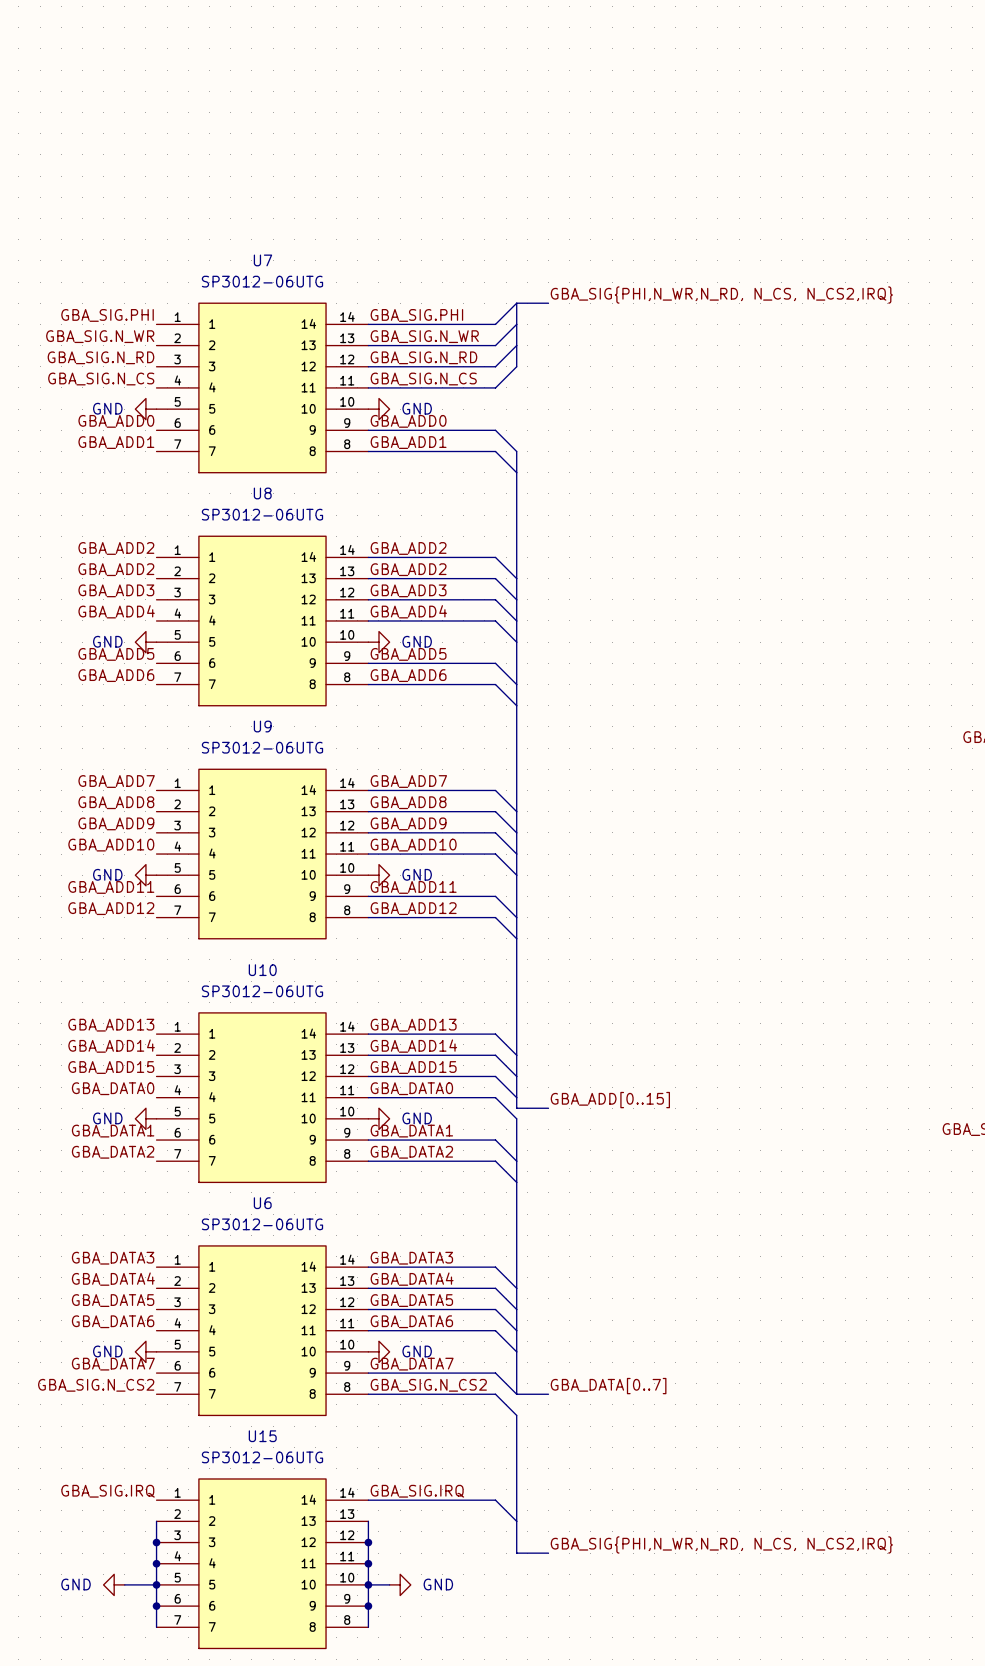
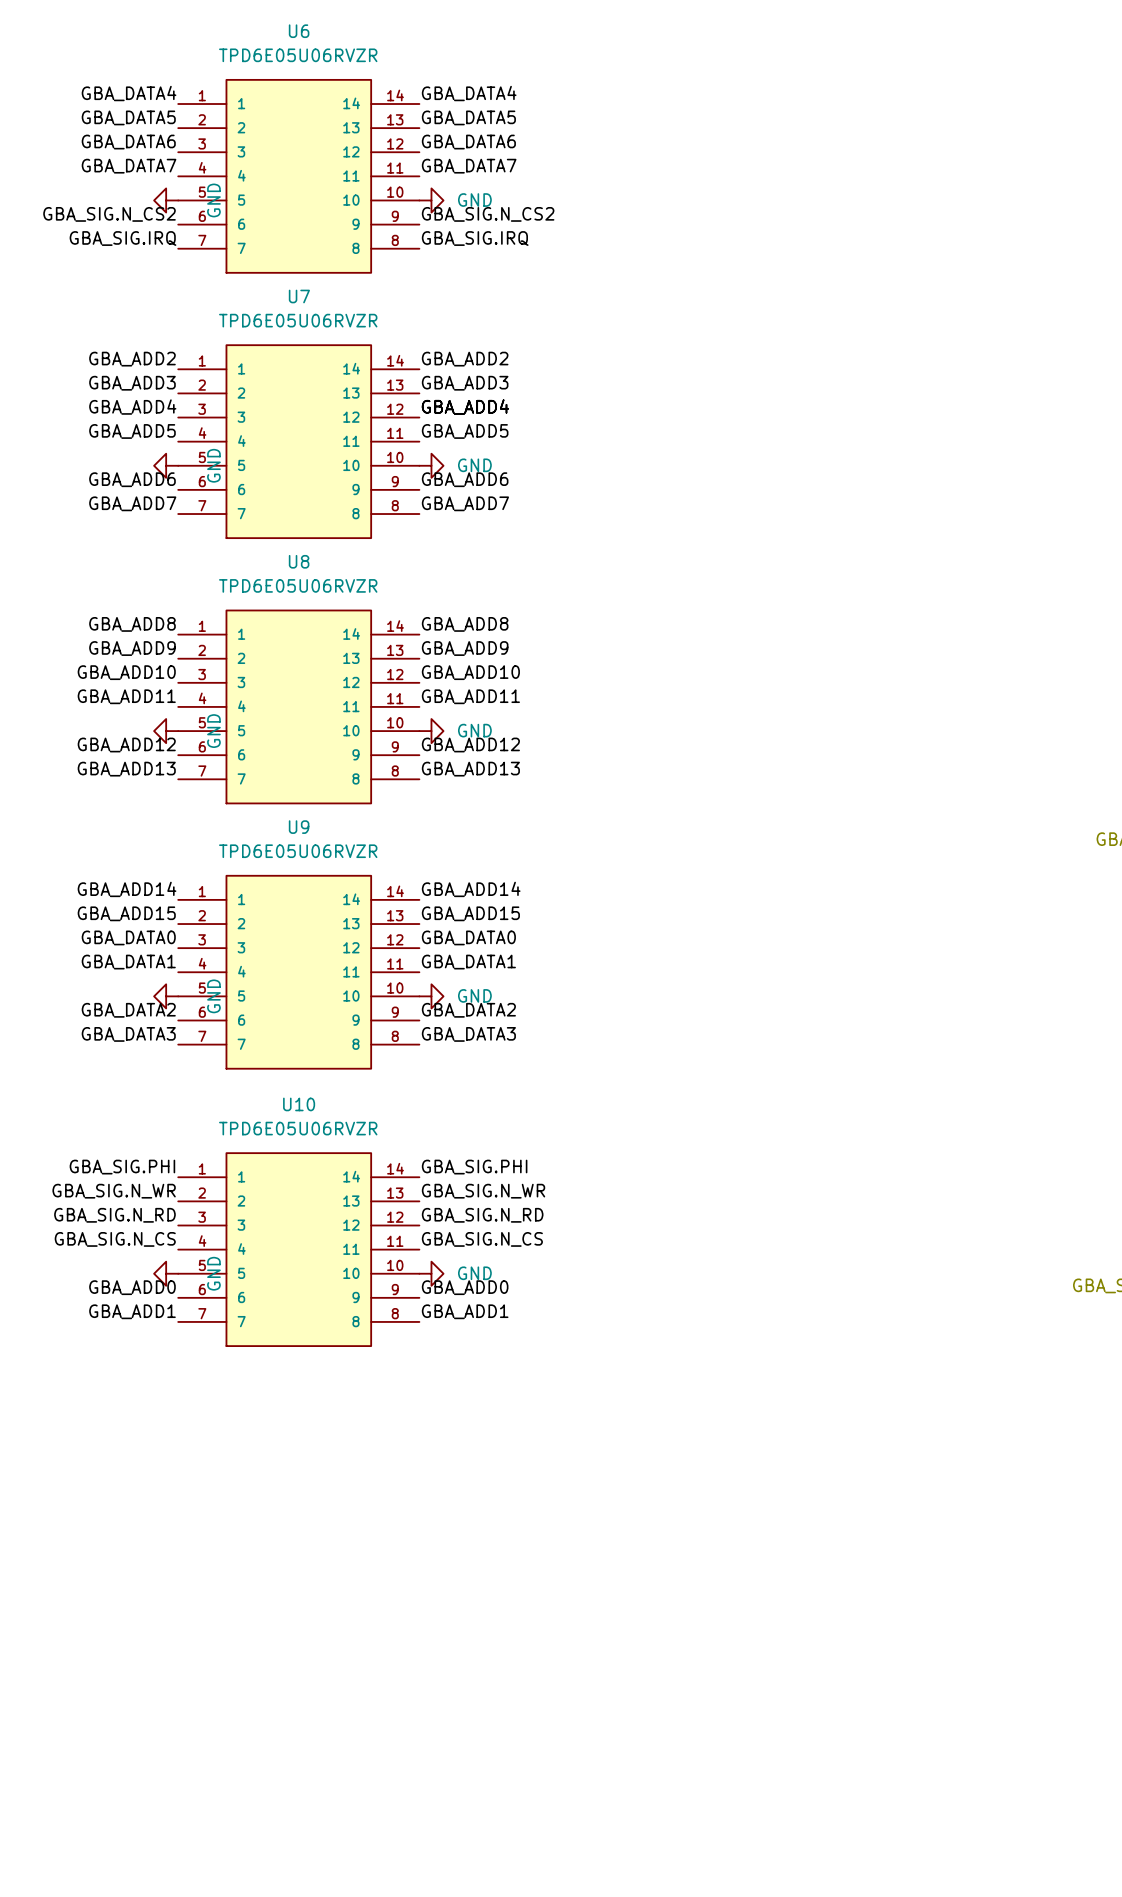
label: none -> GBA_DATA4 (129, 93)
label: none -> GBA_DATA4 (469, 93)
label: none -> GBA_DATA5 (128, 117)
label: none -> GBA_DATA5 (468, 117)
label: none -> GBA_DATA6 (128, 142)
label: none -> GBA_DATA6 (468, 142)
label: none -> GBA_DATA7 (129, 166)
label: none -> GBA_DATA7 (469, 166)
power symbol: none -> GND (166, 200)
power symbol: none -> GND (431, 200)
label: none -> GBA_SIG.N_CS2 (109, 214)
label: none -> GBA_SIG.N_CS2 (488, 214)
label: none -> GBA_SIG.IRQ (123, 238)
label: none -> GBA_SIG.IRQ (475, 238)
U7 value: SP3012-06UTG (262, 281) -> TPD6E05U06RVZR (298, 320)
label: GBA_SIG{PHI,N_WR,N_RD, N_CS, N_CS2,IRQ} (721, 295) -> none
wire: (516, 303) (495, 324) (368, 324) -> none
bus: (548, 303) (516, 303) (516, 366) -> none
label: GBA_SIG.PHI (107, 315) -> GBA_ADD2 (132, 359)
label: GBA_SIG.PHI (416, 315) -> GBA_ADD2 (465, 359)
wire: (516, 324) (495, 345) (368, 345) -> none
label: GBA_SIG.N_WR (100, 336) -> GBA_ADD3 (132, 383)
label: GBA_SIG.N_WR (424, 336) -> GBA_ADD3 (465, 383)
wire: (516, 345) (495, 366) (368, 366) -> none
label: GBA_SIG.N_RD (100, 357) -> GBA_ADD4 (132, 407)
label: GBA_SIG.N_RD (423, 357) -> GBA_ADD4 (465, 407)
wire: (516, 366) (495, 387) (368, 387) -> none
label: GBA_SIG.N_CS (101, 379) -> GBA_ADD5 (132, 431)
label: GBA_SIG.N_CS (423, 379) -> GBA_ADD5 (465, 431)
power symbol text rotation: 0° (107, 408) -> 90° counterclockwise (213, 465)
power symbol text position: GND (107, 408) -> GND (213, 465)
label: GBA_ADD0 (116, 421) -> GBA_ADD6 (132, 479)
label: GBA_ADD0 (408, 421) -> GBA_ADD6 (465, 479)
wire: (368, 430) (495, 430) (516, 451) -> none
label: GBA_ADD1 (116, 442) -> GBA_ADD7 (132, 503)
label: GBA_ADD1 (408, 442) -> GBA_ADD7 (465, 503)
wire: (368, 451) (495, 451) (516, 472) -> none
bus: (516, 451) (516, 1108) (548, 1108) -> none
U8 value: SP3012-06UTG (262, 514) -> TPD6E05U06RVZR (298, 585)
label: GBA_ADD2 (116, 548) -> GBA_ADD8 (132, 624)
label: GBA_ADD2 (408, 548) -> GBA_ADD8 (465, 624)
wire: (368, 557) (495, 557) (516, 578) -> none
label: GBA_ADD2 (116, 569) -> GBA_ADD9 (132, 648)
label: GBA_ADD2 (408, 569) -> GBA_ADD9 (465, 648)
wire: (368, 578) (495, 578) (516, 599) -> none
label: GBA_ADD3 (116, 590) -> GBA_ADD10 (126, 672)
label: GBA_ADD3 (408, 590) -> GBA_ADD10 (470, 672)
wire: (368, 599) (495, 599) (516, 620) -> none
label: GBA_ADD4 (116, 611) -> GBA_ADD11 (126, 696)
label: GBA_ADD4 (408, 611) -> GBA_ADD11 (470, 696)
wire: (368, 620) (495, 620) (516, 642) -> none
power symbol text rotation: 0° (107, 641) -> 90° counterclockwise (213, 731)
power symbol text position: GND (107, 641) -> GND (213, 731)
label: GBA_ADD5 (116, 654) -> GBA_ADD12 (126, 745)
label: GBA_ADD5 (408, 654) -> GBA_ADD12 (470, 745)
wire: (368, 663) (495, 663) (516, 684) -> none
label: GBA_ADD6 (116, 675) -> GBA_ADD13 (126, 769)
label: GBA_ADD6 (408, 675) -> GBA_ADD13 (470, 769)
wire: (368, 684) (495, 684) (516, 705) -> none
U9 value: SP3012-06UTG (262, 747) -> TPD6E05U06RVZR (298, 851)
label: GBA_ADD7 (116, 781) -> GBA_ADD14 (127, 889)
label: GBA_ADD7 (408, 781) -> GBA_ADD14 (471, 889)
wire: (368, 790) (495, 790) (516, 811) -> none
label: GBA_ADD8 (116, 802) -> GBA_ADD15 (126, 913)
label: GBA_ADD8 (408, 802) -> GBA_ADD15 (470, 913)
wire: (368, 811) (495, 811) (516, 832) -> none
label: GBA_ADD9 (116, 823) -> GBA_DATA0 (128, 937)
label: GBA_ADD9 (408, 823) -> GBA_DATA0 (468, 937)
wire: (368, 832) (495, 832) (516, 854) -> none
label: GBA_ADD10 (111, 845) -> GBA_DATA1 (128, 962)
label: GBA_ADD10 (413, 845) -> GBA_DATA1 (468, 962)
wire: (368, 854) (495, 854) (516, 875) -> none
power symbol text rotation: 0° (107, 874) -> 90° counterclockwise (213, 996)
power symbol text position: GND (107, 874) -> GND (213, 996)
label: GBA_ADD11 (111, 887) -> GBA_DATA2 (128, 1010)
label: GBA_ADD11 (413, 887) -> GBA_DATA2 (468, 1010)
wire: (368, 896) (495, 896) (516, 917) -> none
label: GBA_ADD12 (111, 908) -> GBA_DATA3 (128, 1034)
label: GBA_ADD12 (413, 908) -> GBA_DATA3 (468, 1034)
wire: (368, 917) (495, 917) (516, 938) -> none
U10 value: SP3012-06UTG (262, 991) -> TPD6E05U06RVZR (298, 1128)
label: GBA_ADD13 (111, 1025) -> GBA_SIG.PHI (122, 1167)
label: GBA_ADD13 (413, 1025) -> GBA_SIG.PHI (474, 1167)
wire: (368, 1034) (495, 1034) (516, 1055) -> none
label: GBA_ADD14 (111, 1046) -> GBA_SIG.N_WR (114, 1191)
label: GBA_ADD14 (413, 1046) -> GBA_SIG.N_WR (483, 1191)
wire: (368, 1055) (495, 1055) (516, 1076) -> none
label: GBA_ADD15 (111, 1067) -> GBA_SIG.N_RD (114, 1215)
label: GBA_ADD15 (413, 1067) -> GBA_SIG.N_RD (482, 1215)
wire: (368, 1076) (495, 1076) (516, 1097) -> none
label: GBA_DATA0 (113, 1088) -> GBA_SIG.N_CS (115, 1239)
label: GBA_DATA0 (411, 1088) -> GBA_SIG.N_CS (482, 1239)
wire: (368, 1097) (495, 1097) (516, 1118) -> none
label: GBA_ADD[0..15] (610, 1100) -> none
power symbol text rotation: 0° (107, 1118) -> 90° counterclockwise (213, 1273)
power symbol text position: GND (107, 1118) -> GND (213, 1273)
bus: (516, 1118) (516, 1394) (548, 1394) -> none
label: GBA_DATA1 (113, 1131) -> GBA_ADD0 (132, 1287)
label: GBA_DATA1 (411, 1131) -> GBA_ADD0 (465, 1287)
wire: (368, 1140) (495, 1140) (516, 1161) -> none
label: GBA_DATA2 (113, 1152) -> GBA_ADD1 (132, 1311)
label: GBA_DATA2 (411, 1152) -> GBA_ADD1 (465, 1311)
wire: (368, 1161) (495, 1161) (516, 1182) -> none
U6 value: SP3012-06UTG (262, 1224) -> TPD6E05U06RVZR (298, 55)
label: GBA_DATA3 (113, 1258) -> none
label: GBA_DATA3 (411, 1258) -> none
wire: (368, 1267) (495, 1267) (516, 1288) -> none
label: GBA_DATA4 (113, 1279) -> none
label: GBA_DATA4 (412, 1279) -> none
wire: (368, 1288) (495, 1288) (516, 1309) -> none
label: GBA_DATA5 (113, 1300) -> none
label: GBA_DATA5 (411, 1300) -> none
wire: (368, 1309) (495, 1309) (516, 1330) -> none
label: GBA_DATA6 (113, 1321) -> none
label: GBA_DATA6 (411, 1321) -> none
U6 position: (262, 1330) -> (298, 176)
wire: (368, 1330) (495, 1330) (516, 1351) -> none
power symbol: GND (145, 1351) -> none
power symbol: GND (378, 1351) -> none
label: GBA_DATA7 (113, 1364) -> none
label: GBA_DATA7 (412, 1364) -> none
wire: (368, 1373) (495, 1373) (516, 1394) -> none
label: GBA_SIG.N_CS2 (96, 1385) -> none
label: GBA_SIG.N_CS2 (428, 1385) -> none
label: GBA_DATA[0..7] (608, 1386) -> none
wire: (368, 1394) (495, 1394) (516, 1415) -> none
bus: (516, 1415) (516, 1553) (548, 1553) -> none
label: GBA_SIG.IRQ (108, 1491) -> none
label: GBA_SIG.IRQ (417, 1491) -> none
wire: (368, 1500) (495, 1500) (516, 1521) -> none
wire: (156, 1521) (156, 1627) -> none
wire: (368, 1521) (368, 1627) -> none
junction: (156, 1542) -> none
junction: (368, 1542) -> none
label: GBA_SIG{PHI,N_WR,N_RD, N_CS, N_CS2,IRQ} (721, 1544) -> none
junction: (156, 1563) -> none
U15: SP3012-06UTG (262, 1563) -> none
junction: (368, 1563) -> none
power symbol: GND (114, 1584) -> none
wire: (124, 1584) (156, 1584) -> none
junction: (156, 1584) -> none
wire: (368, 1584) (389, 1584) -> none
junction: (368, 1584) -> none
power symbol: GND (400, 1584) -> none
junction: (156, 1606) -> none
junction: (368, 1606) -> none

